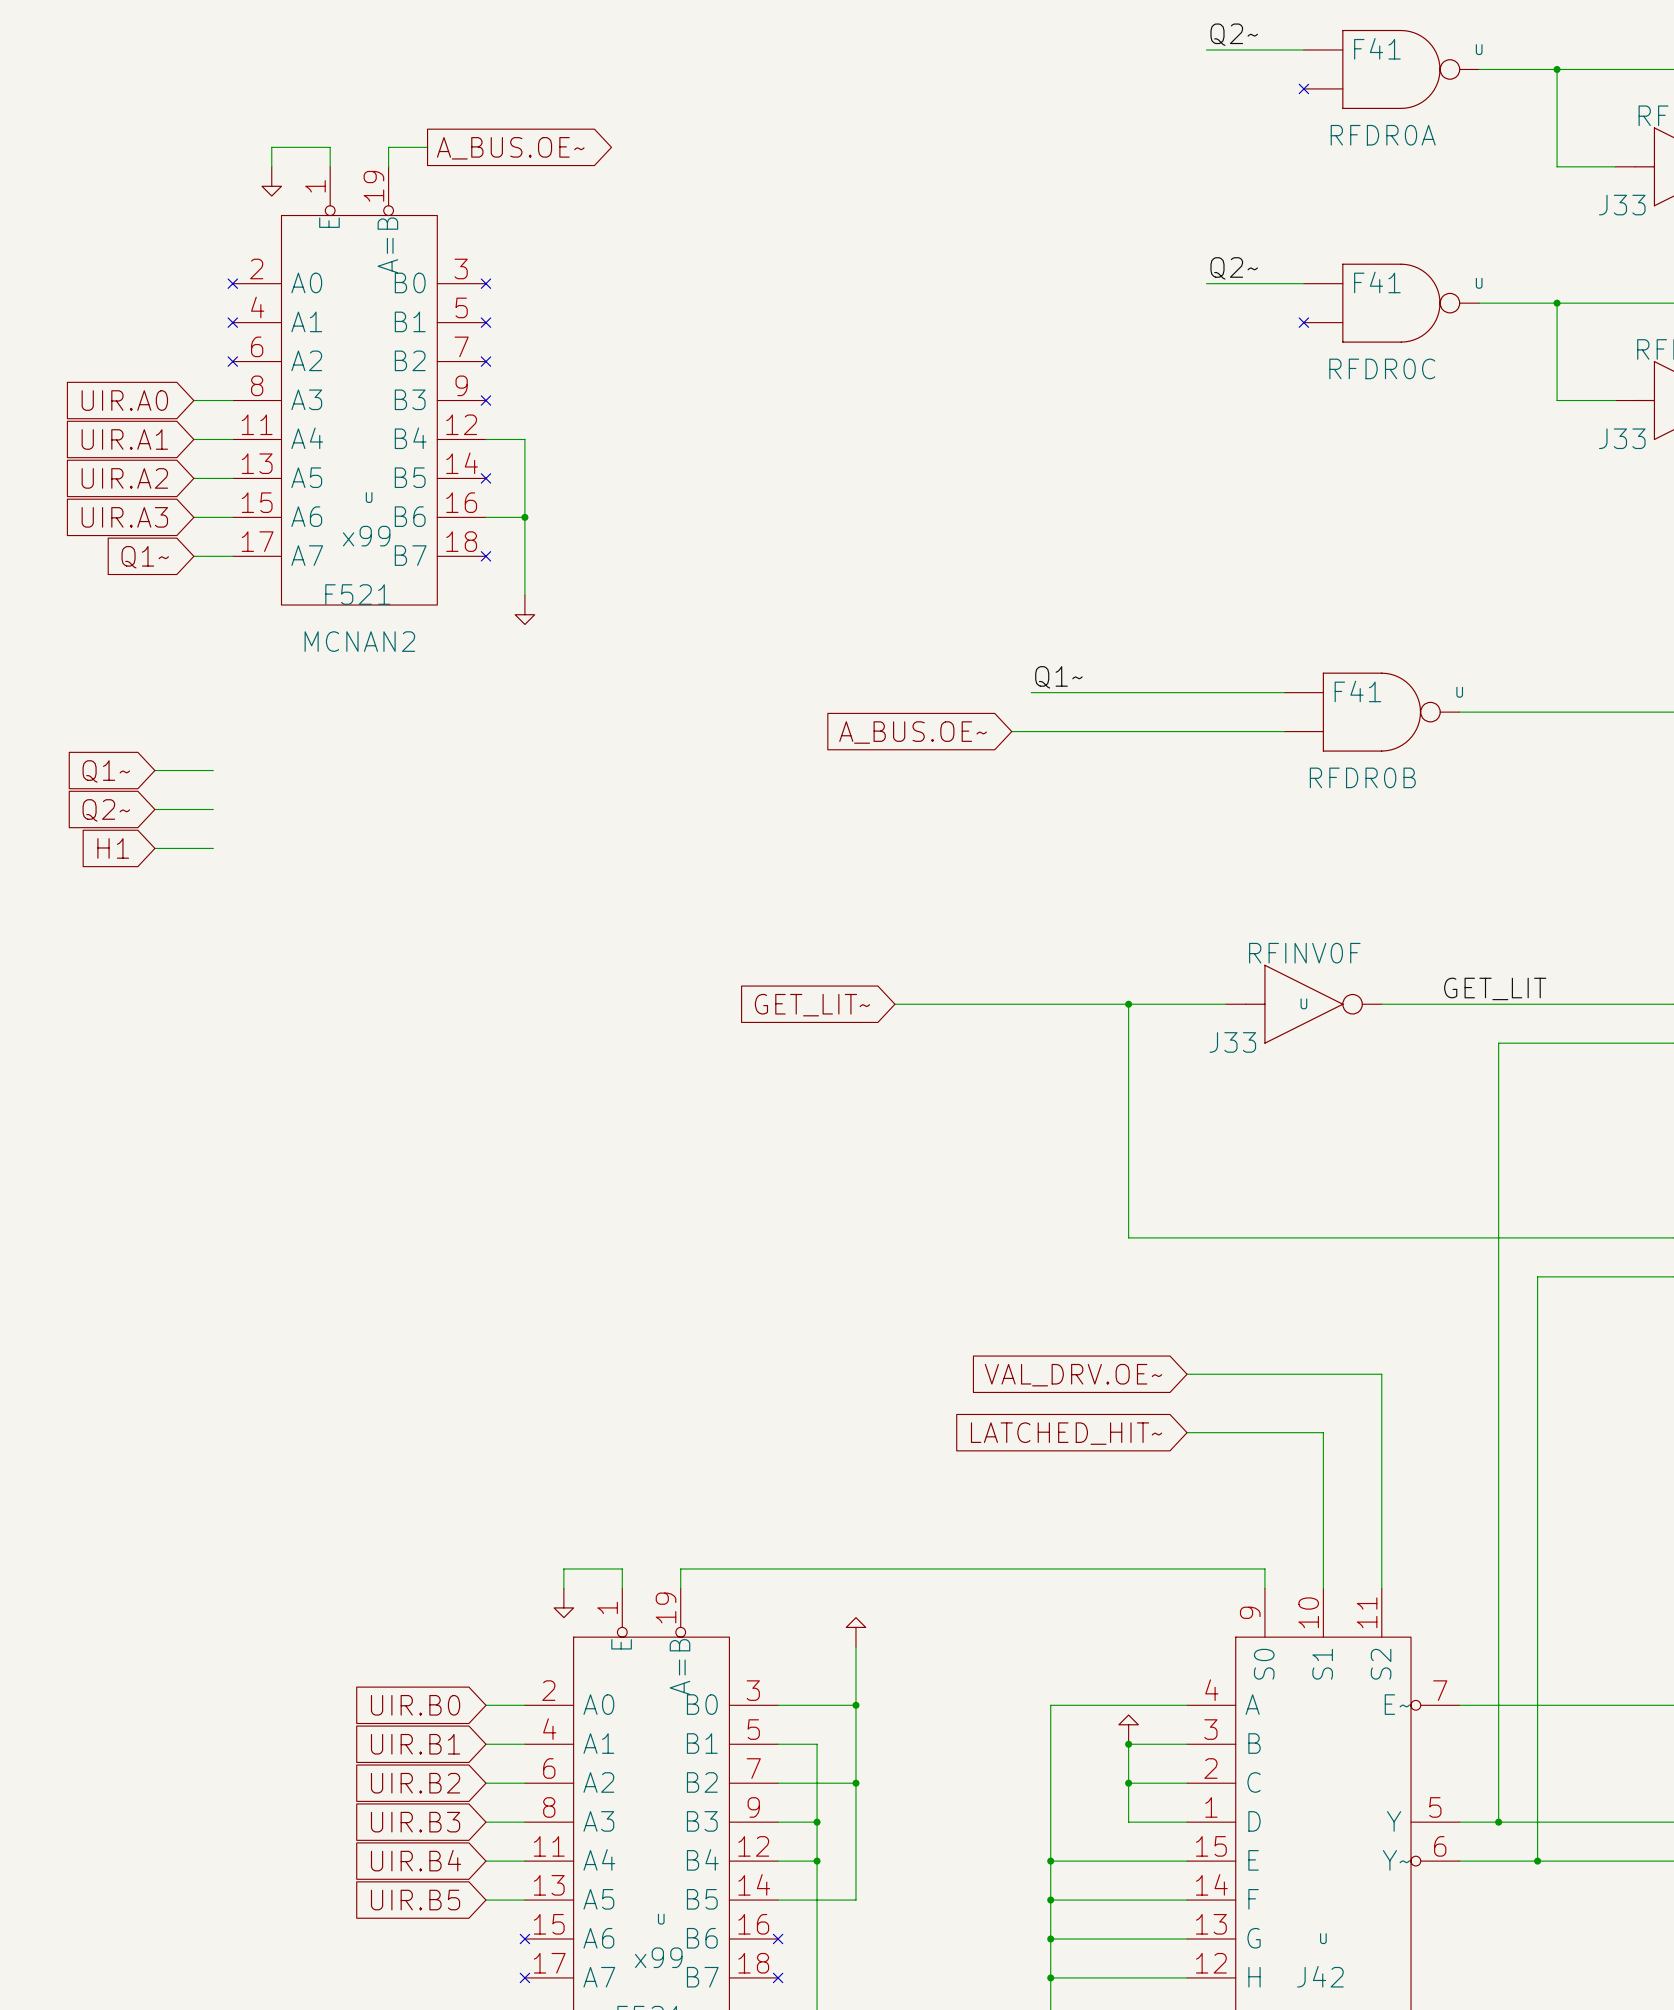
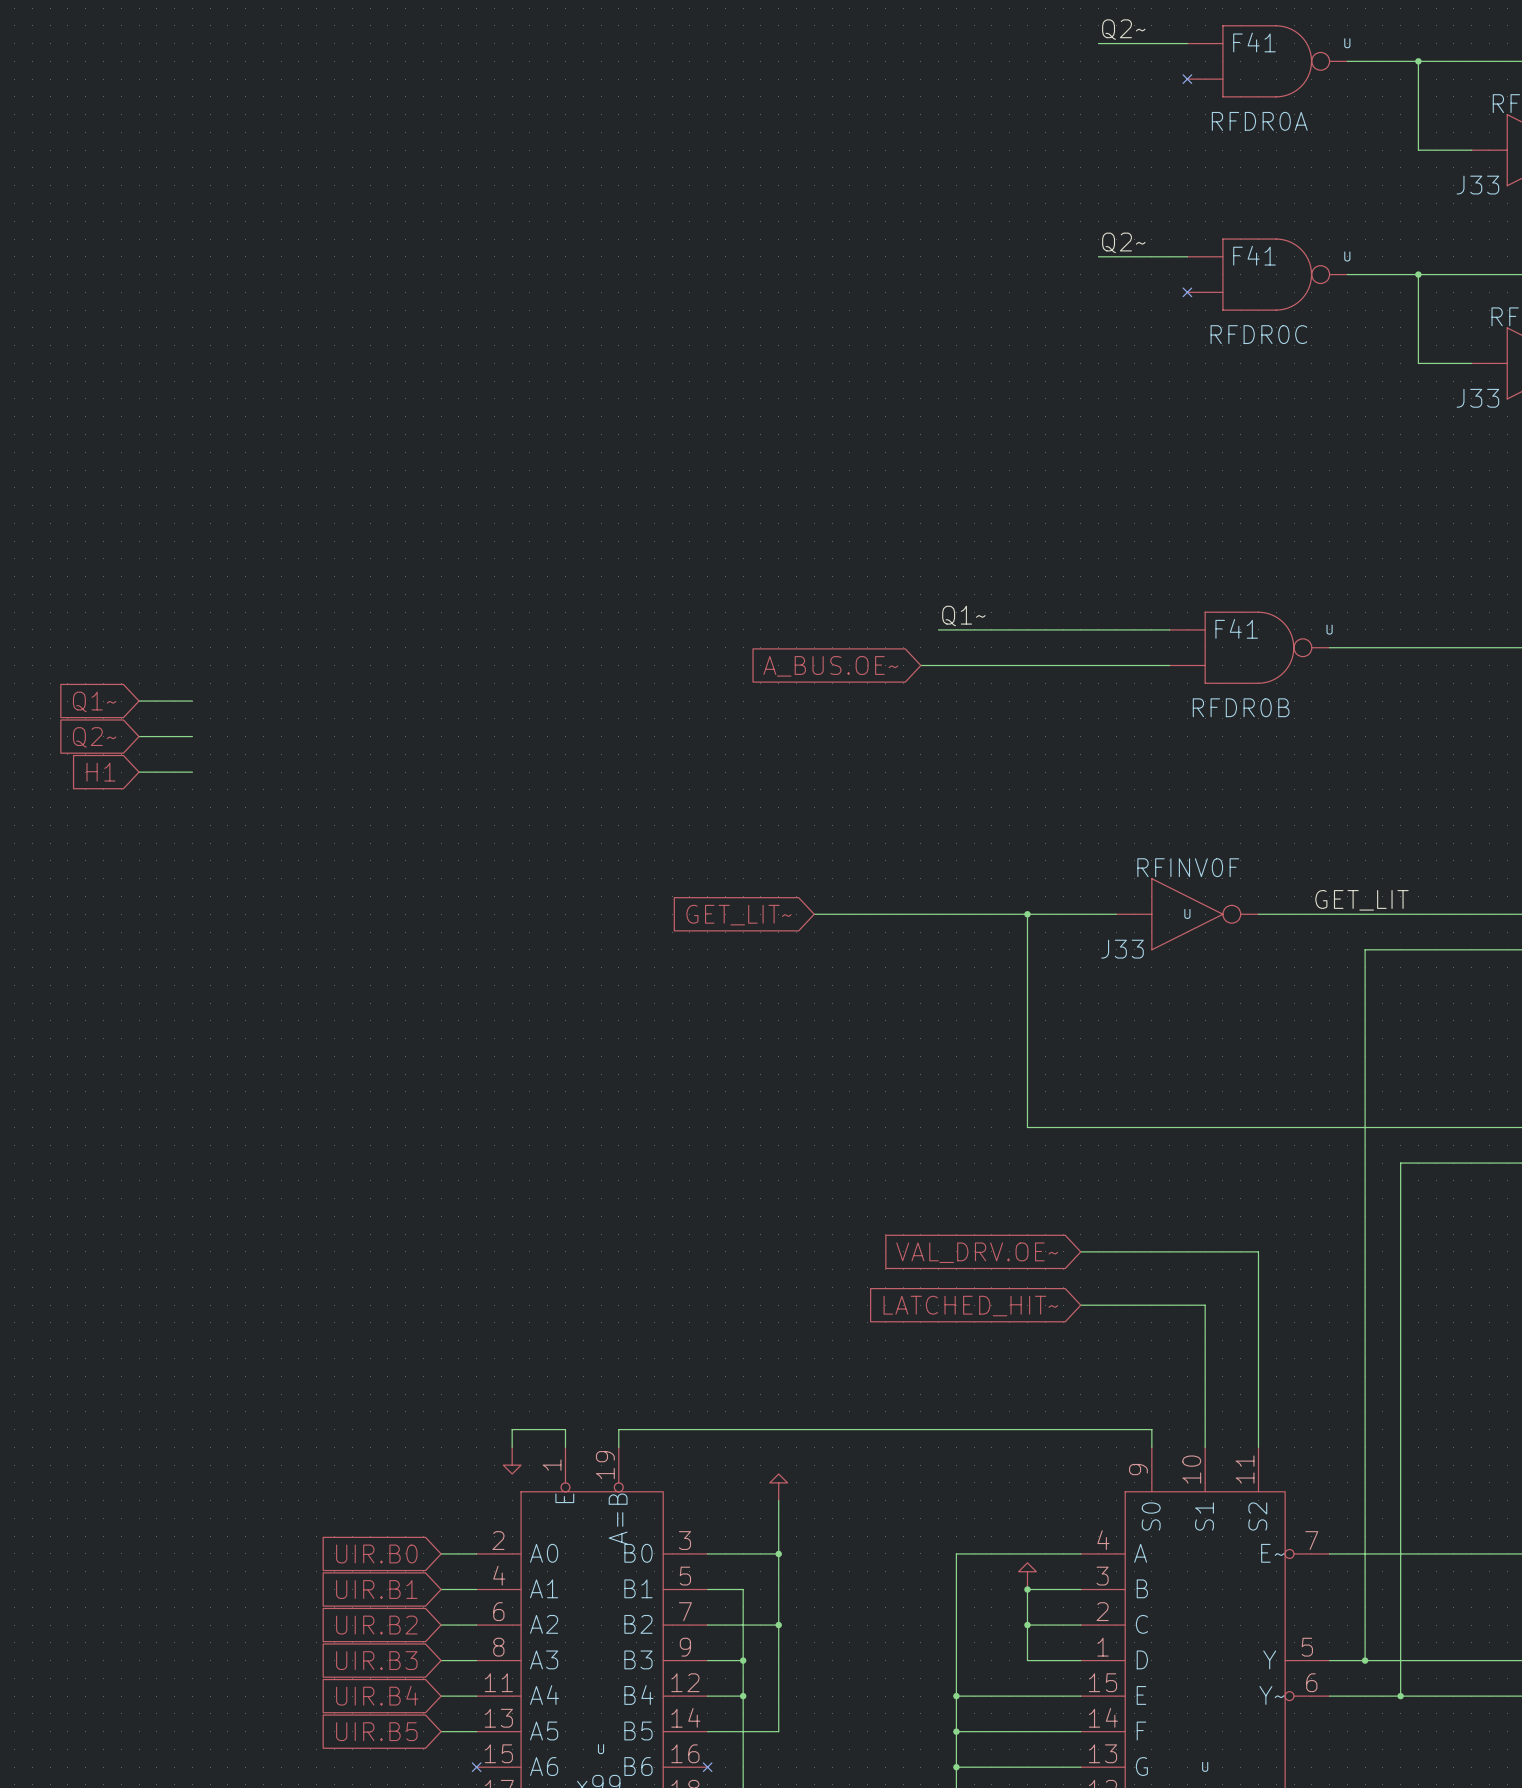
wire: (427, 147) (388, 147) (388, 166) -> none
global label: A_BUS.OE~ (510, 148) -> none
wire: (271, 166) (271, 147) (330, 147) (330, 166) -> none
power symbol: (271, 181) -> none
no-connect mark: (232, 283) -> none
no-connect mark: (485, 283) -> none
no-connect mark: (232, 322) -> none
no-connect mark: (485, 322) -> none
no-connect mark: (232, 361) -> none
no-connect mark: (485, 361) -> none
U: F521 (359, 385) -> none
global label: UIR.A0 (124, 400) -> none
wire: (193, 400) (232, 400) -> none
no-connect mark: (485, 400) -> none
global label: UIR.A1 (124, 439) -> none
wire: (193, 439) (232, 439) -> none
wire: (485, 439) (524, 439) (524, 595) -> none
global label: UIR.A2 (124, 478) -> none
wire: (193, 478) (232, 478) -> none
no-connect mark: (485, 478) -> none
global label: UIR.A3 (124, 517) -> none
wire: (193, 517) (232, 517) -> none
wire: (485, 517) (524, 517) -> none
junction: (524, 517) -> none
wire: (193, 556) (232, 556) -> none
no-connect mark: (485, 556) -> none
global label: Q1~ (145, 557) -> none
power symbol: (524, 610) -> none

